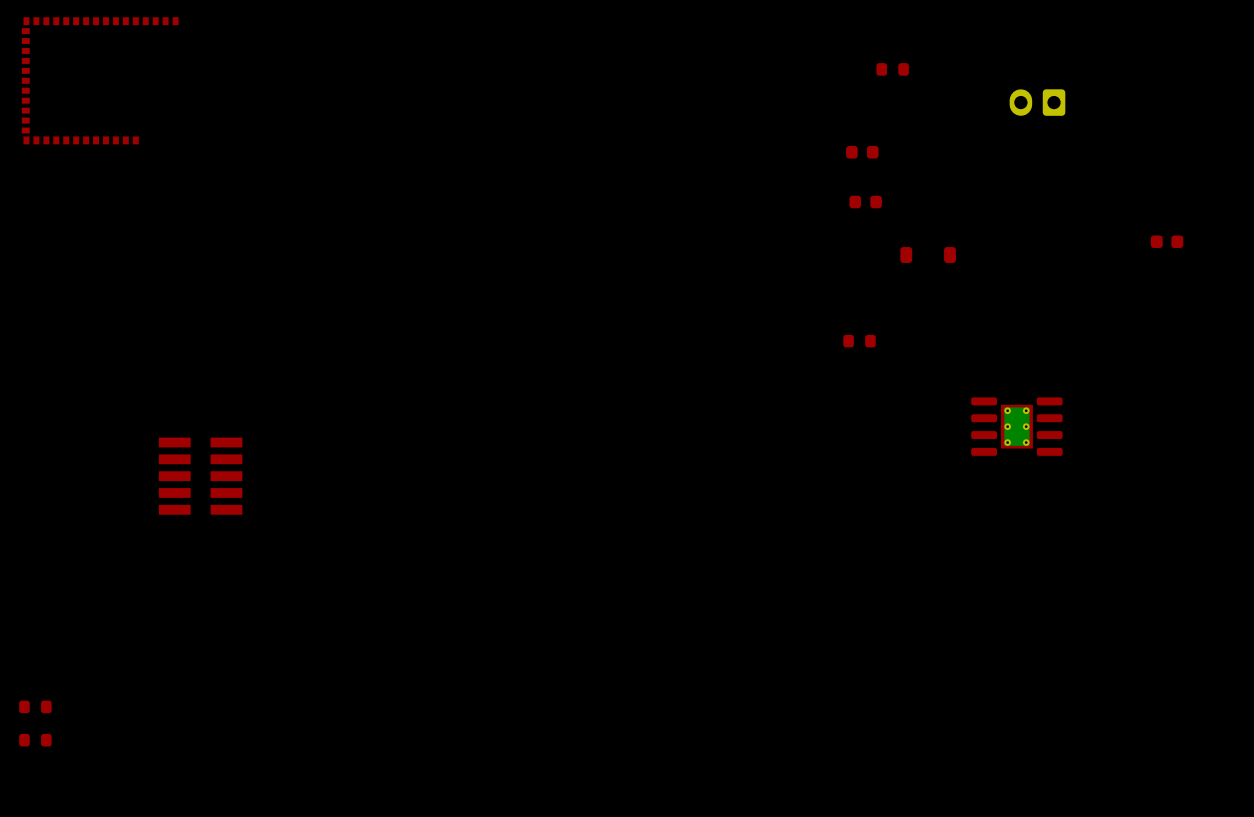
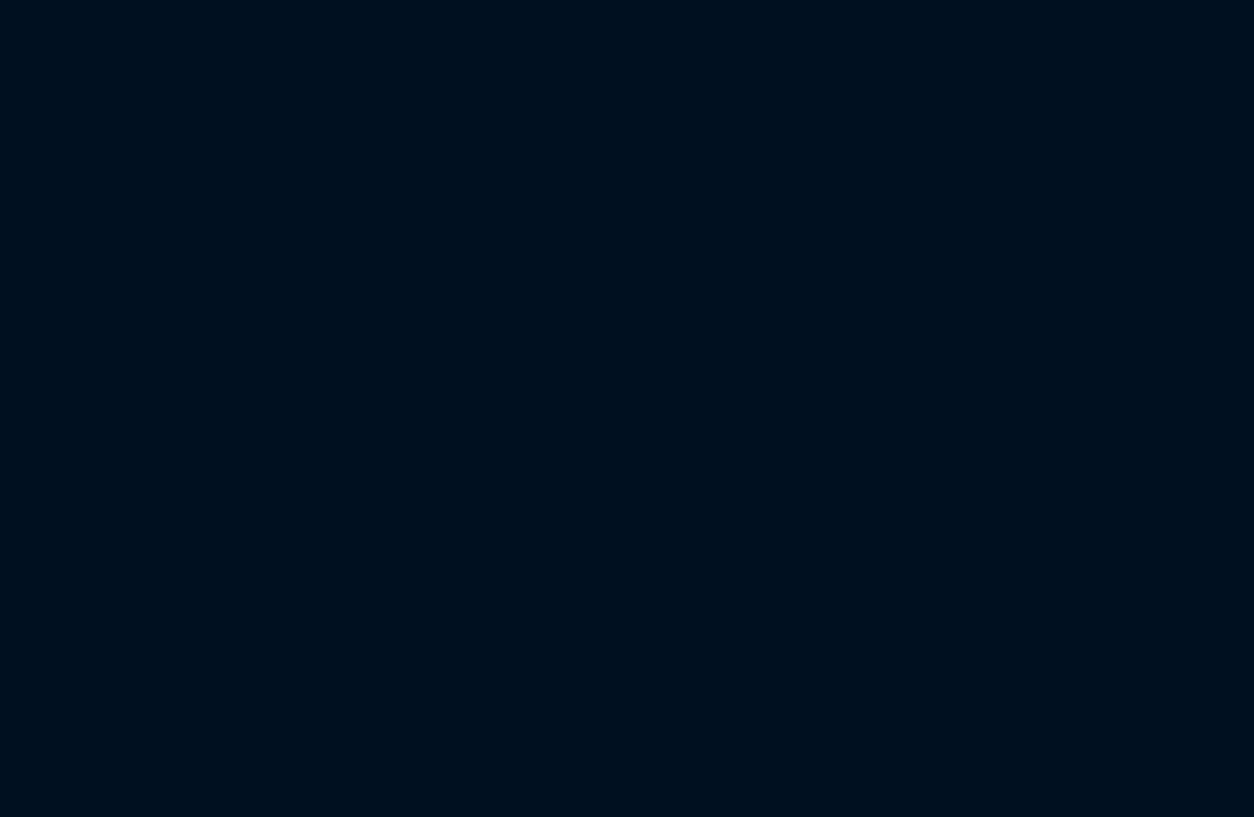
part: (892, 69) -> none
part: (100, 80) -> none
part: (1037, 102) -> none
part: (862, 152) -> none
part: (865, 201) -> none
part: (1167, 241) -> none
part: (928, 254) -> none
part: (859, 341) -> none
part: (1016, 426) -> none
part: (200, 476) -> none
part: (35, 706) -> none
part: (35, 740) -> none

